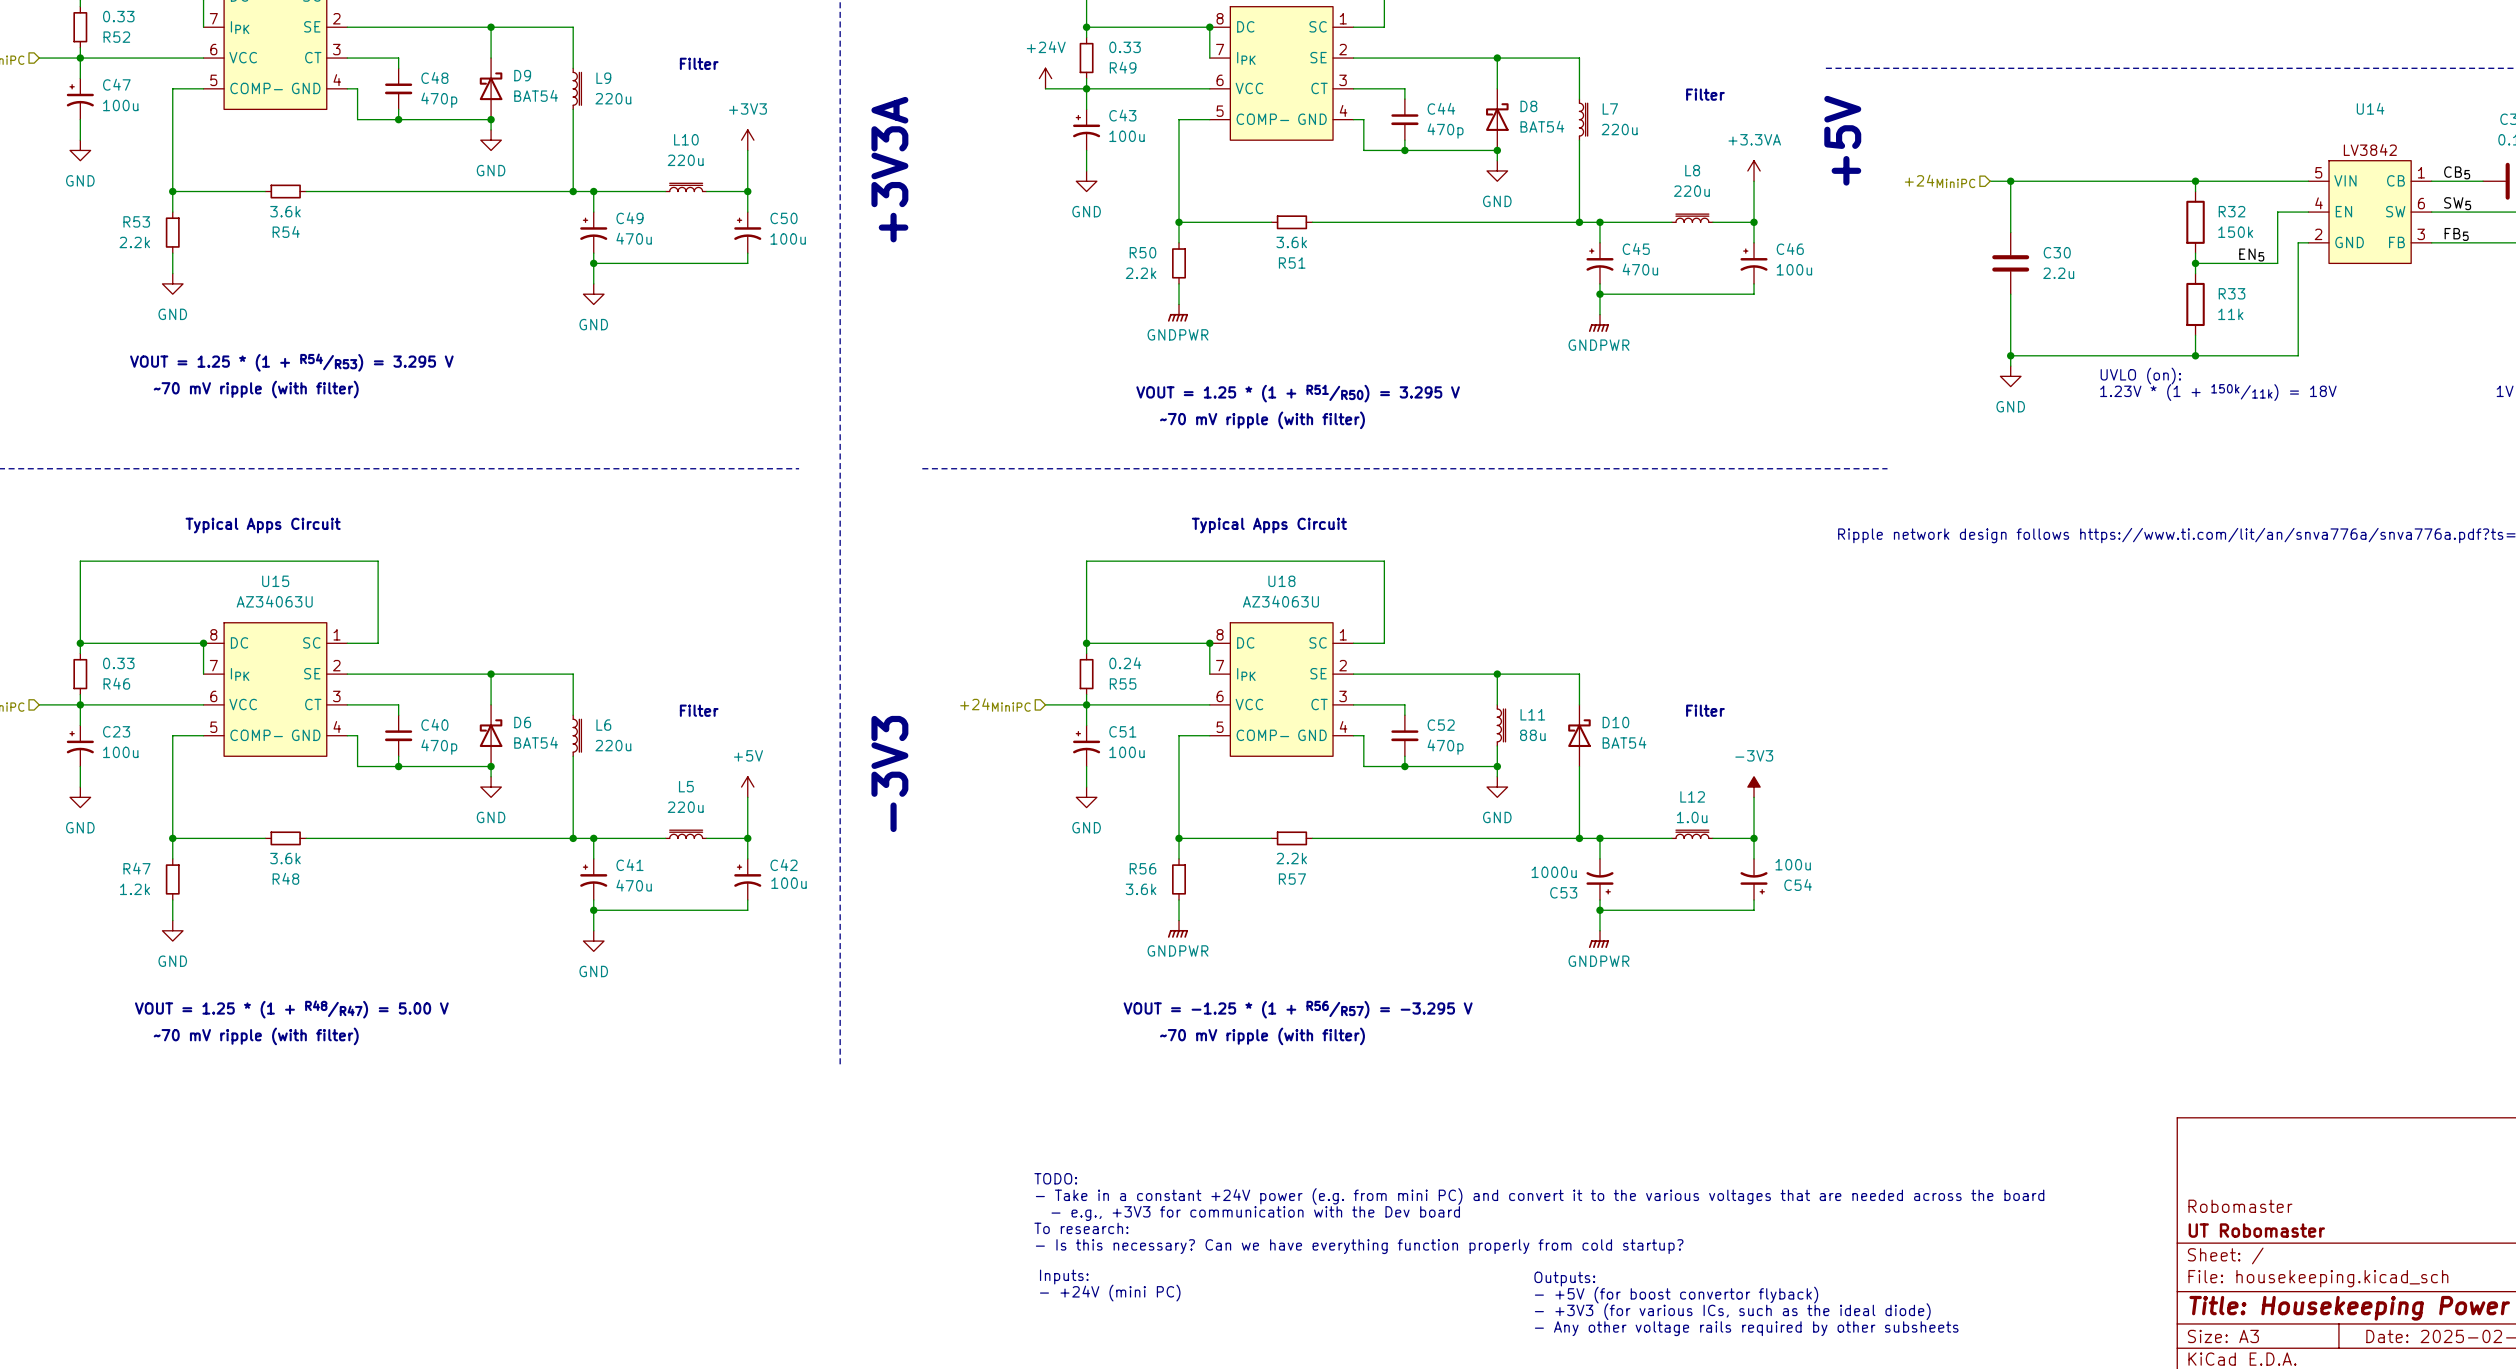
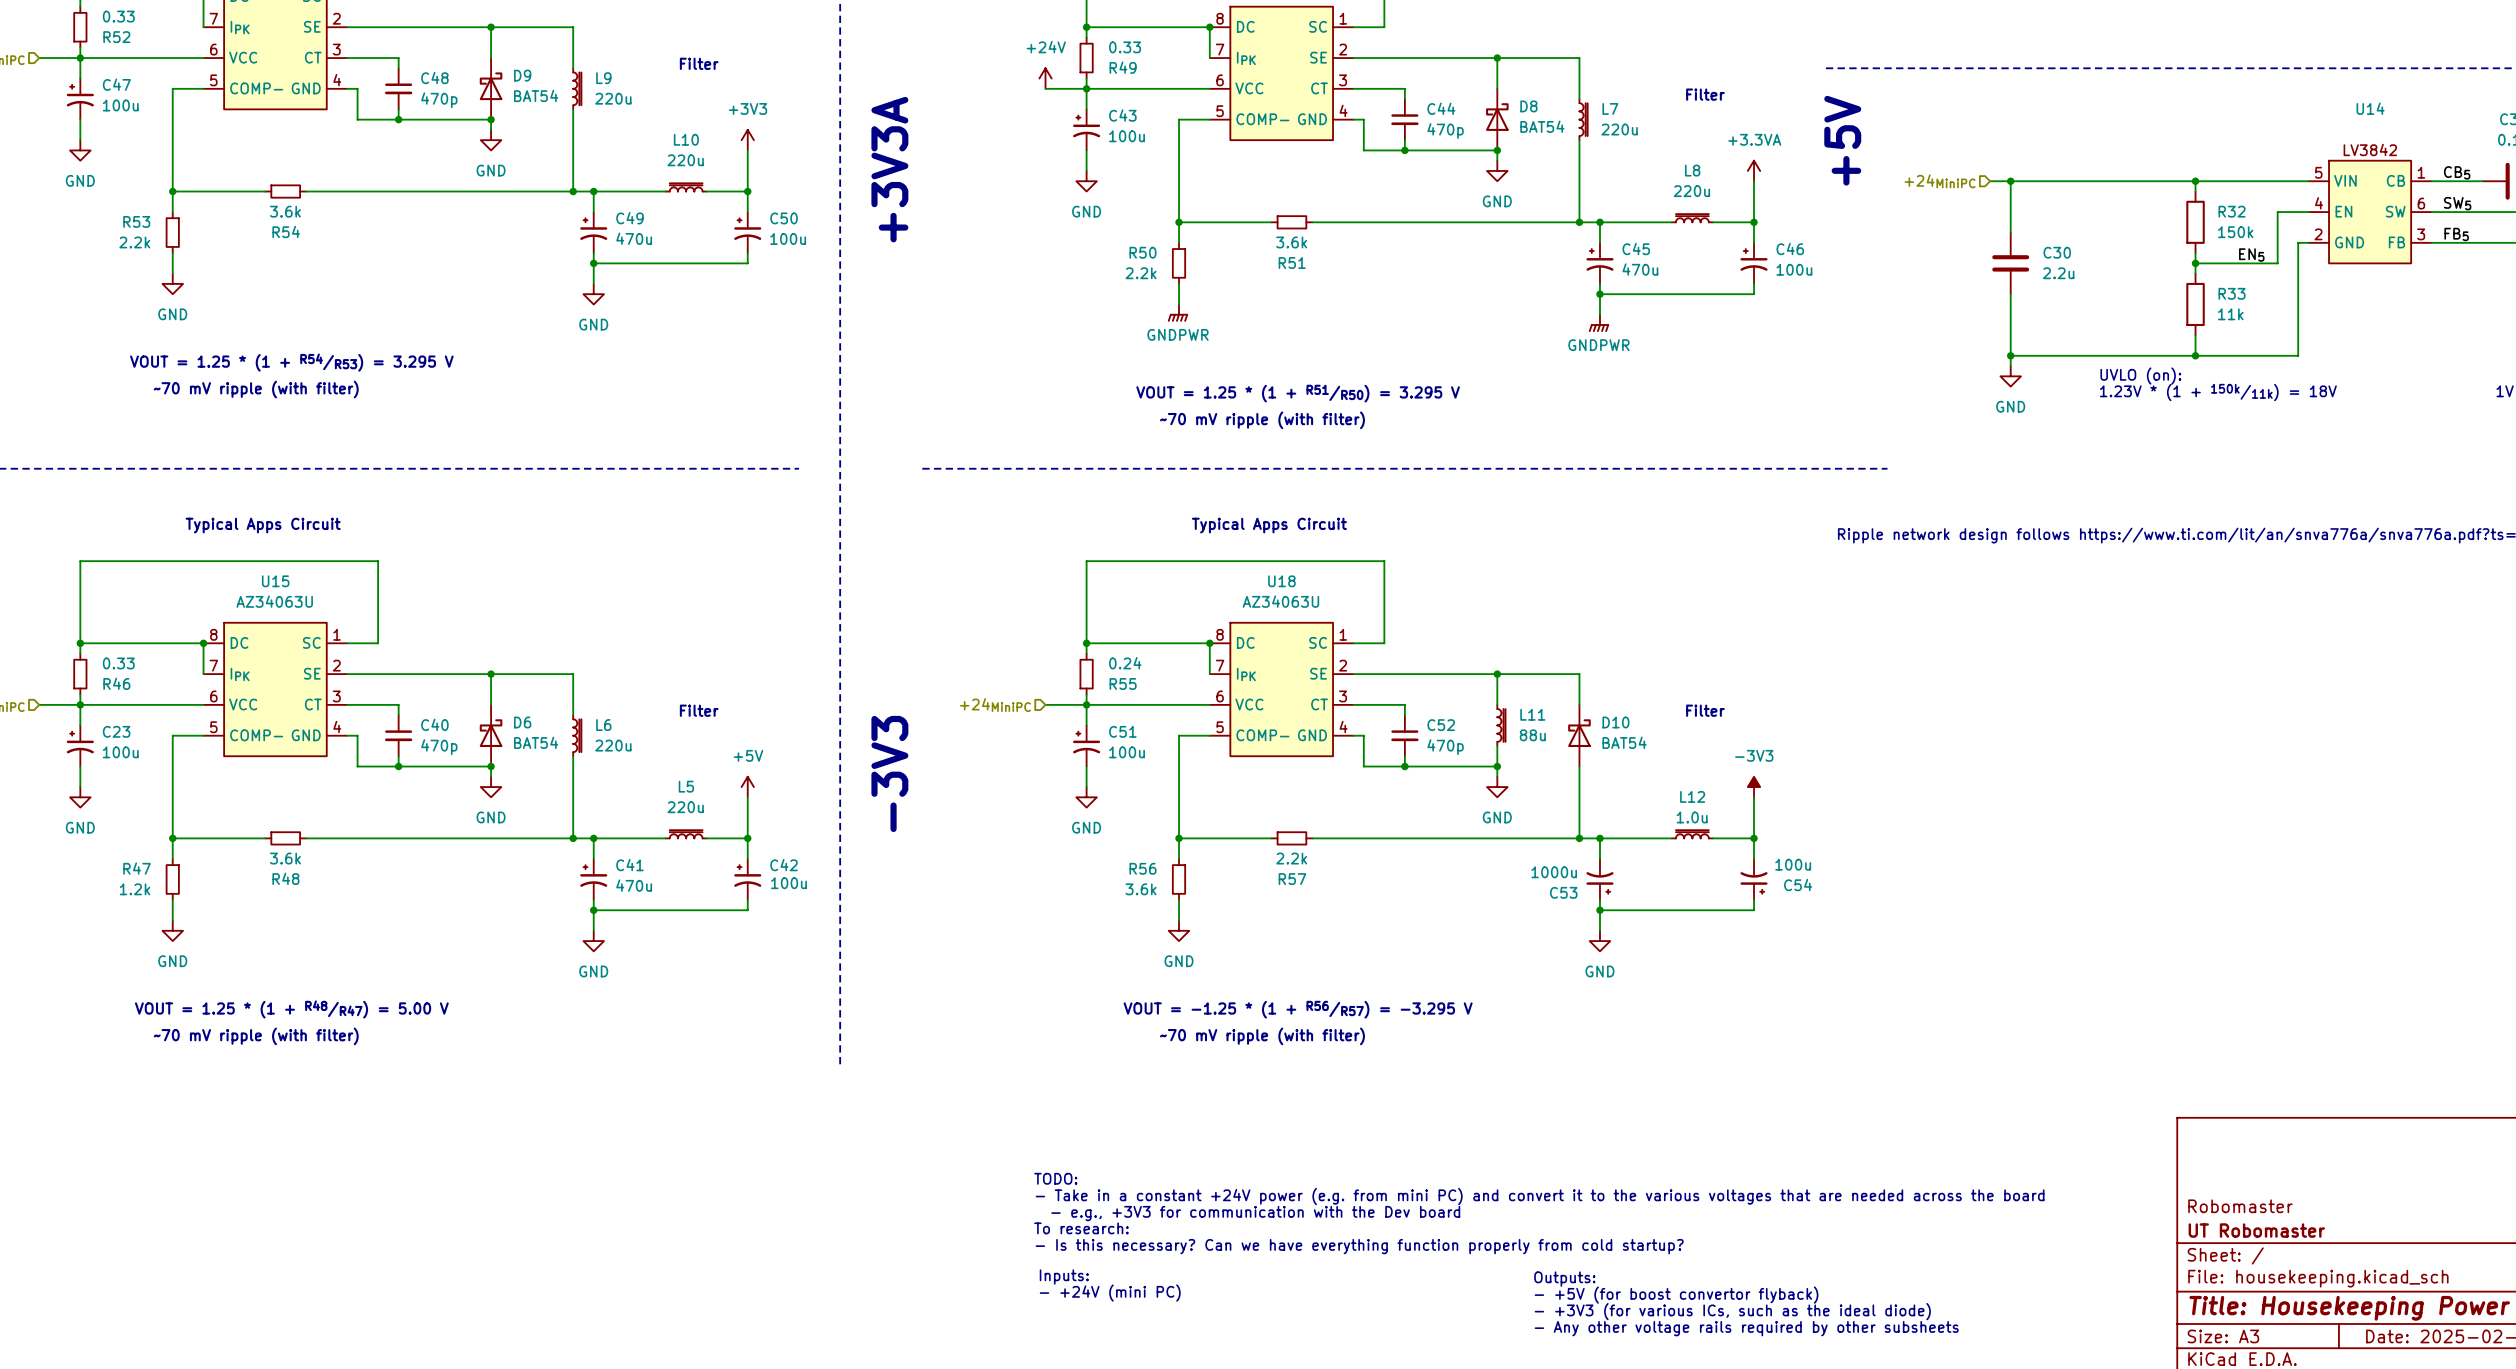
power symbol: GNDPWR (1177, 929) -> GND (1179, 930)
power symbol: GNDPWR (1598, 939) -> GND (1599, 941)

